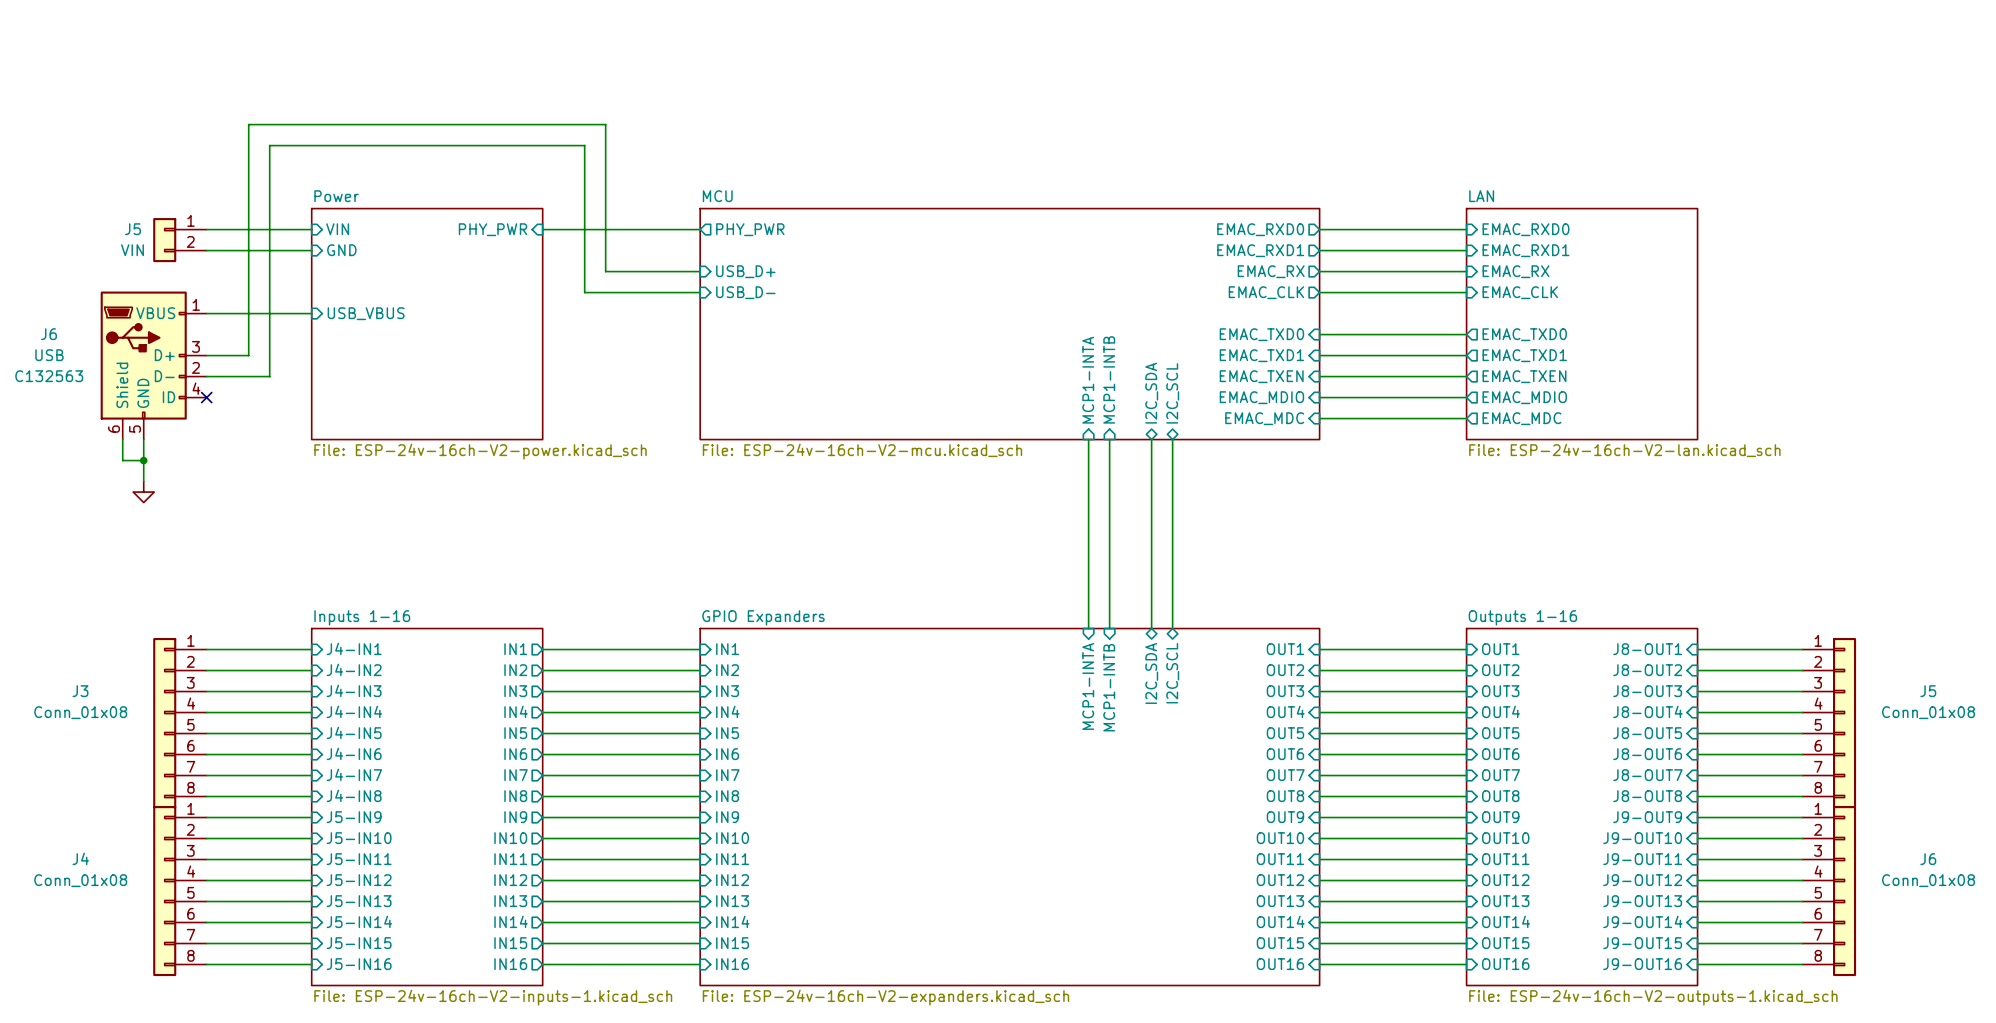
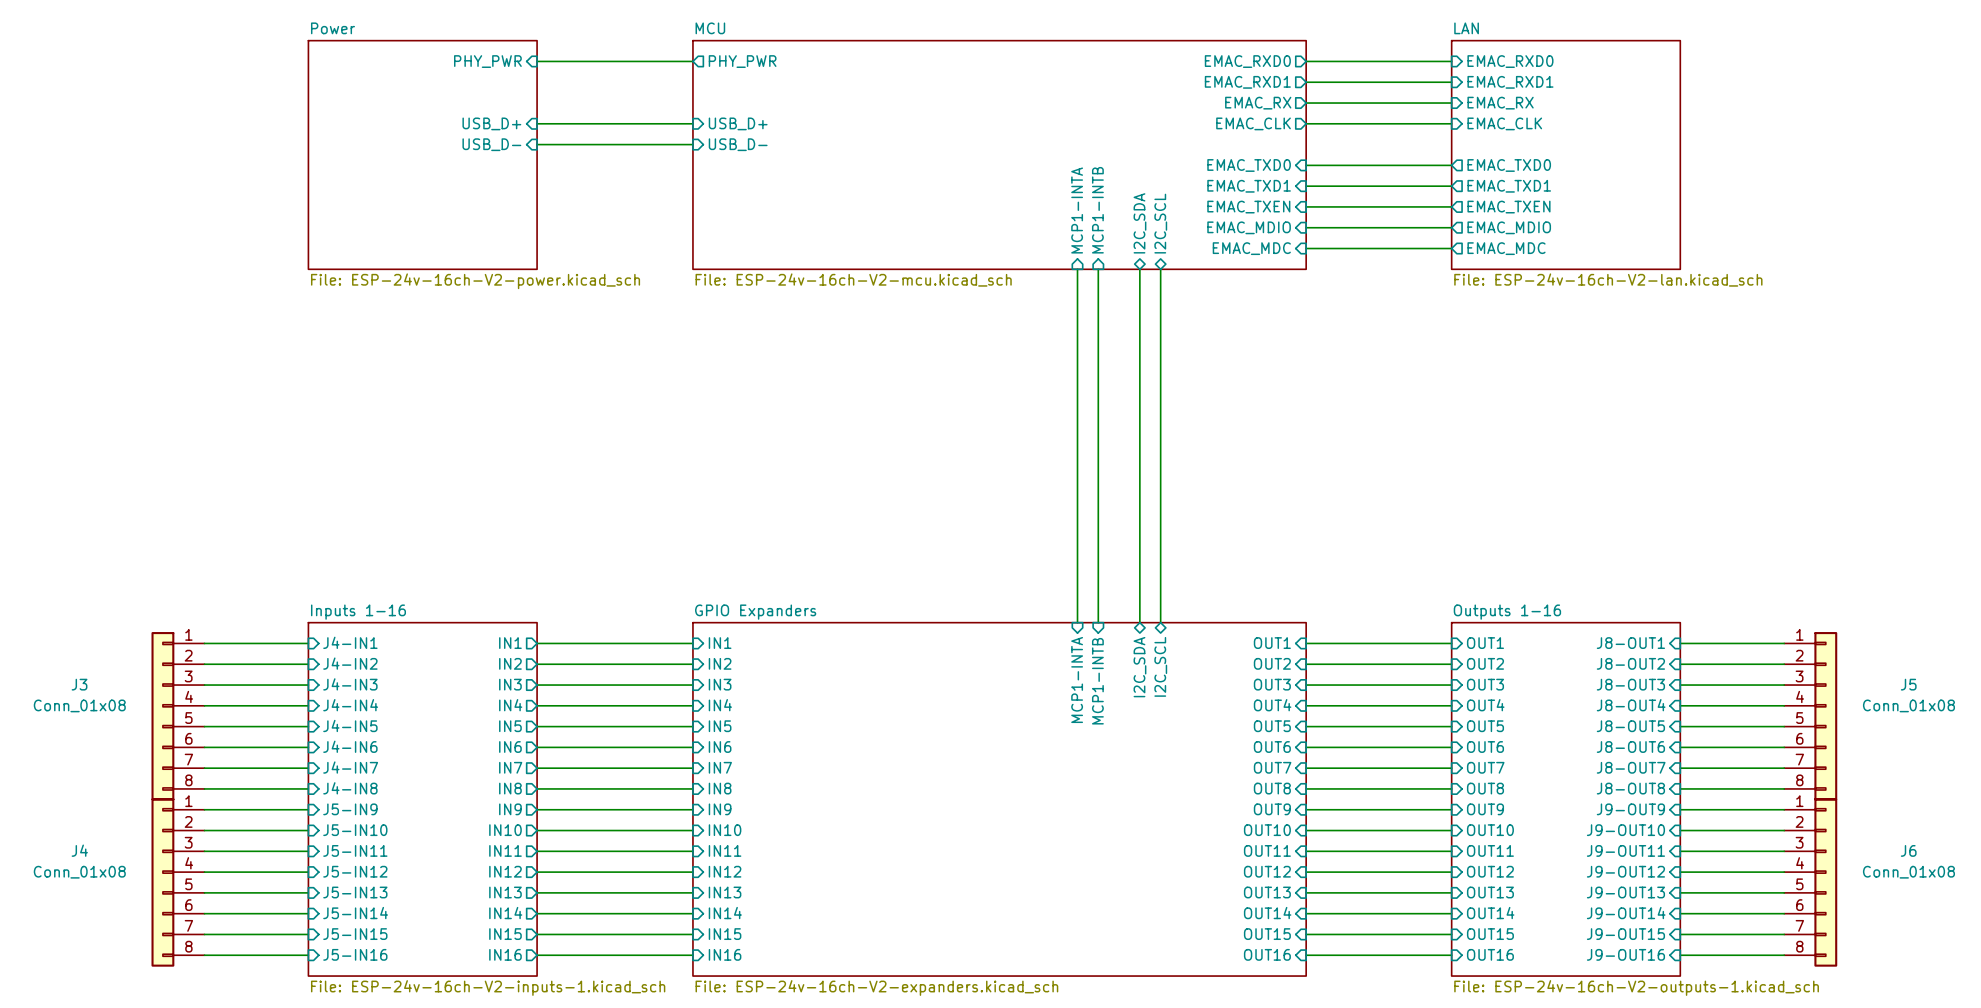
sheet pin: none -> PHY_PWR (487, 61)
sheet pin: none -> PHY_PWR (742, 61)
sheet pin: none -> EMAC_RXD0 (1247, 61)
wire: none -> (1306, 61) (1451, 61)
sheet pin: none -> EMAC_RXD0 (1510, 61)
sheet pin: none -> EMAC_RXD1 (1247, 82)
wire: none -> (1306, 82) (1451, 82)
sheet pin: none -> EMAC_RXD1 (1510, 82)
sheet pin: none -> EMAC_RX (1258, 103)
sheet pin: none -> EMAC_RX (1500, 103)
sheet pin: none -> USB_D+ (491, 123)
wire: (542, 124) (248, 124) (248, 355) (206, 355) -> none
wire: (605, 124) (605, 271) (700, 271) -> (599, 123) (692, 123)
sheet pin: none -> USB_D+ (738, 123)
sheet pin: none -> EMAC_CLK (1253, 123)
sheet pin: none -> EMAC_CLK (1504, 123)
sheet pin: none -> USB_D- (491, 144)
wire: (542, 145) (269, 145) (269, 376) (206, 376) -> none
wire: (584, 145) (584, 292) (700, 292) -> (578, 144) (692, 144)
sheet pin: none -> USB_D- (738, 144)
sheet pin: none -> EMAC_TXD0 (1249, 165)
sheet pin: none -> EMAC_TXD0 (1509, 165)
sheet pin: none -> EMAC_TXD1 (1249, 186)
sheet pin: none -> EMAC_TXD1 (1509, 186)
sheet pin: none -> EMAC_TXEN (1248, 207)
sheet pin: none -> EMAC_TXEN (1508, 207)
wire: (206, 229) (311, 229) -> none
sheet pin: VIN (337, 229) -> none
sheet pin: PHY_PWR (493, 229) -> none
wire: (542, 229) (700, 229) -> (537, 61) (692, 61)
sheet pin: PHY_PWR (750, 229) -> none
sheet pin shape: output (1260, 229) -> input (1249, 227)
sheet pin: EMAC_RXD0 (1260, 229) -> EMAC_MDIO (1249, 227)
sheet pin shape: input (1525, 229) -> output (1509, 227)
sheet pin: EMAC_RXD0 (1525, 229) -> EMAC_MDIO (1509, 227)
J5: VIN (179, 240) -> none
wire: (206, 250) (311, 250) -> none
sheet pin: GND (341, 250) -> none
sheet pin shape: output (1260, 250) -> input (1251, 248)
sheet pin: EMAC_RXD1 (1260, 250) -> EMAC_MDC (1251, 248)
sheet pin shape: input (1525, 250) -> output (1506, 248)
sheet pin: EMAC_RXD1 (1525, 250) -> EMAC_MDC (1506, 248)
sheet pin: USB_D+ (745, 271) -> none
wire: none -> (1077, 269) (1077, 435)
wire: none -> (1098, 269) (1098, 435)
wire: none -> (1139, 269) (1139, 435)
wire: none -> (1160, 269) (1160, 435)
sheet pin: EMAC_RX (1271, 271) -> none
wire: (1319, 271) (1466, 271) -> (1306, 103) (1451, 103)
sheet pin: EMAC_RX (1515, 271) -> none
sheet pin: USB_D- (745, 292) -> none
sheet pin: EMAC_CLK (1266, 292) -> none
wire: (1319, 292) (1466, 292) -> (1306, 123) (1451, 123)
sheet pin: EMAC_CLK (1520, 292) -> none
wire: (206, 313) (311, 313) -> none
sheet pin: USB_VBUS (366, 313) -> none
sheet Power position: (427, 324) -> (422, 154)
sheet MCU position: (1009, 324) -> (999, 154)
sheet LAN position: (1582, 324) -> (1565, 154)
sheet pin: EMAC_TXD0 (1261, 334) -> none
wire: (1319, 334) (1466, 334) -> (1306, 165) (1451, 165)
sheet pin: EMAC_TXD0 (1524, 334) -> none
sheet pin: EMAC_TXD1 (1261, 355) -> none
wire: (1319, 355) (1466, 355) -> (1306, 186) (1451, 186)
sheet pin: EMAC_TXD1 (1524, 355) -> none
J6: USB (153, 365) -> none
sheet pin: EMAC_TXEN (1261, 376) -> none
wire: (1319, 376) (1466, 376) -> (1306, 206) (1451, 206)
sheet pin: EMAC_TXEN (1524, 376) -> none
sheet pin position: MCP1-INTB (1109, 379) -> MCP1-INTB (1097, 210)
sheet pin position: MCP1-INTA (1088, 380) -> MCP1-INTA (1077, 210)
sheet pin position: I2C_SDA (1151, 393) -> I2C_SDA (1139, 223)
sheet pin position: I2C_SCL (1172, 393) -> I2C_SCL (1160, 223)
no-connect mark: (206, 397) -> none
sheet pin: EMAC_MDIO (1261, 397) -> none
wire: (1319, 397) (1466, 397) -> none
sheet pin: EMAC_MDIO (1524, 397) -> none
sheet pin: EMAC_MDC (1264, 418) -> none
wire: (1319, 418) (1466, 418) -> none
sheet pin: EMAC_MDC (1521, 418) -> none
wire: (122, 439) (122, 460) (143, 460) -> none
wire: (143, 439) (143, 481) -> none
junction: (143, 460) -> none
power symbol: (143, 492) -> none

